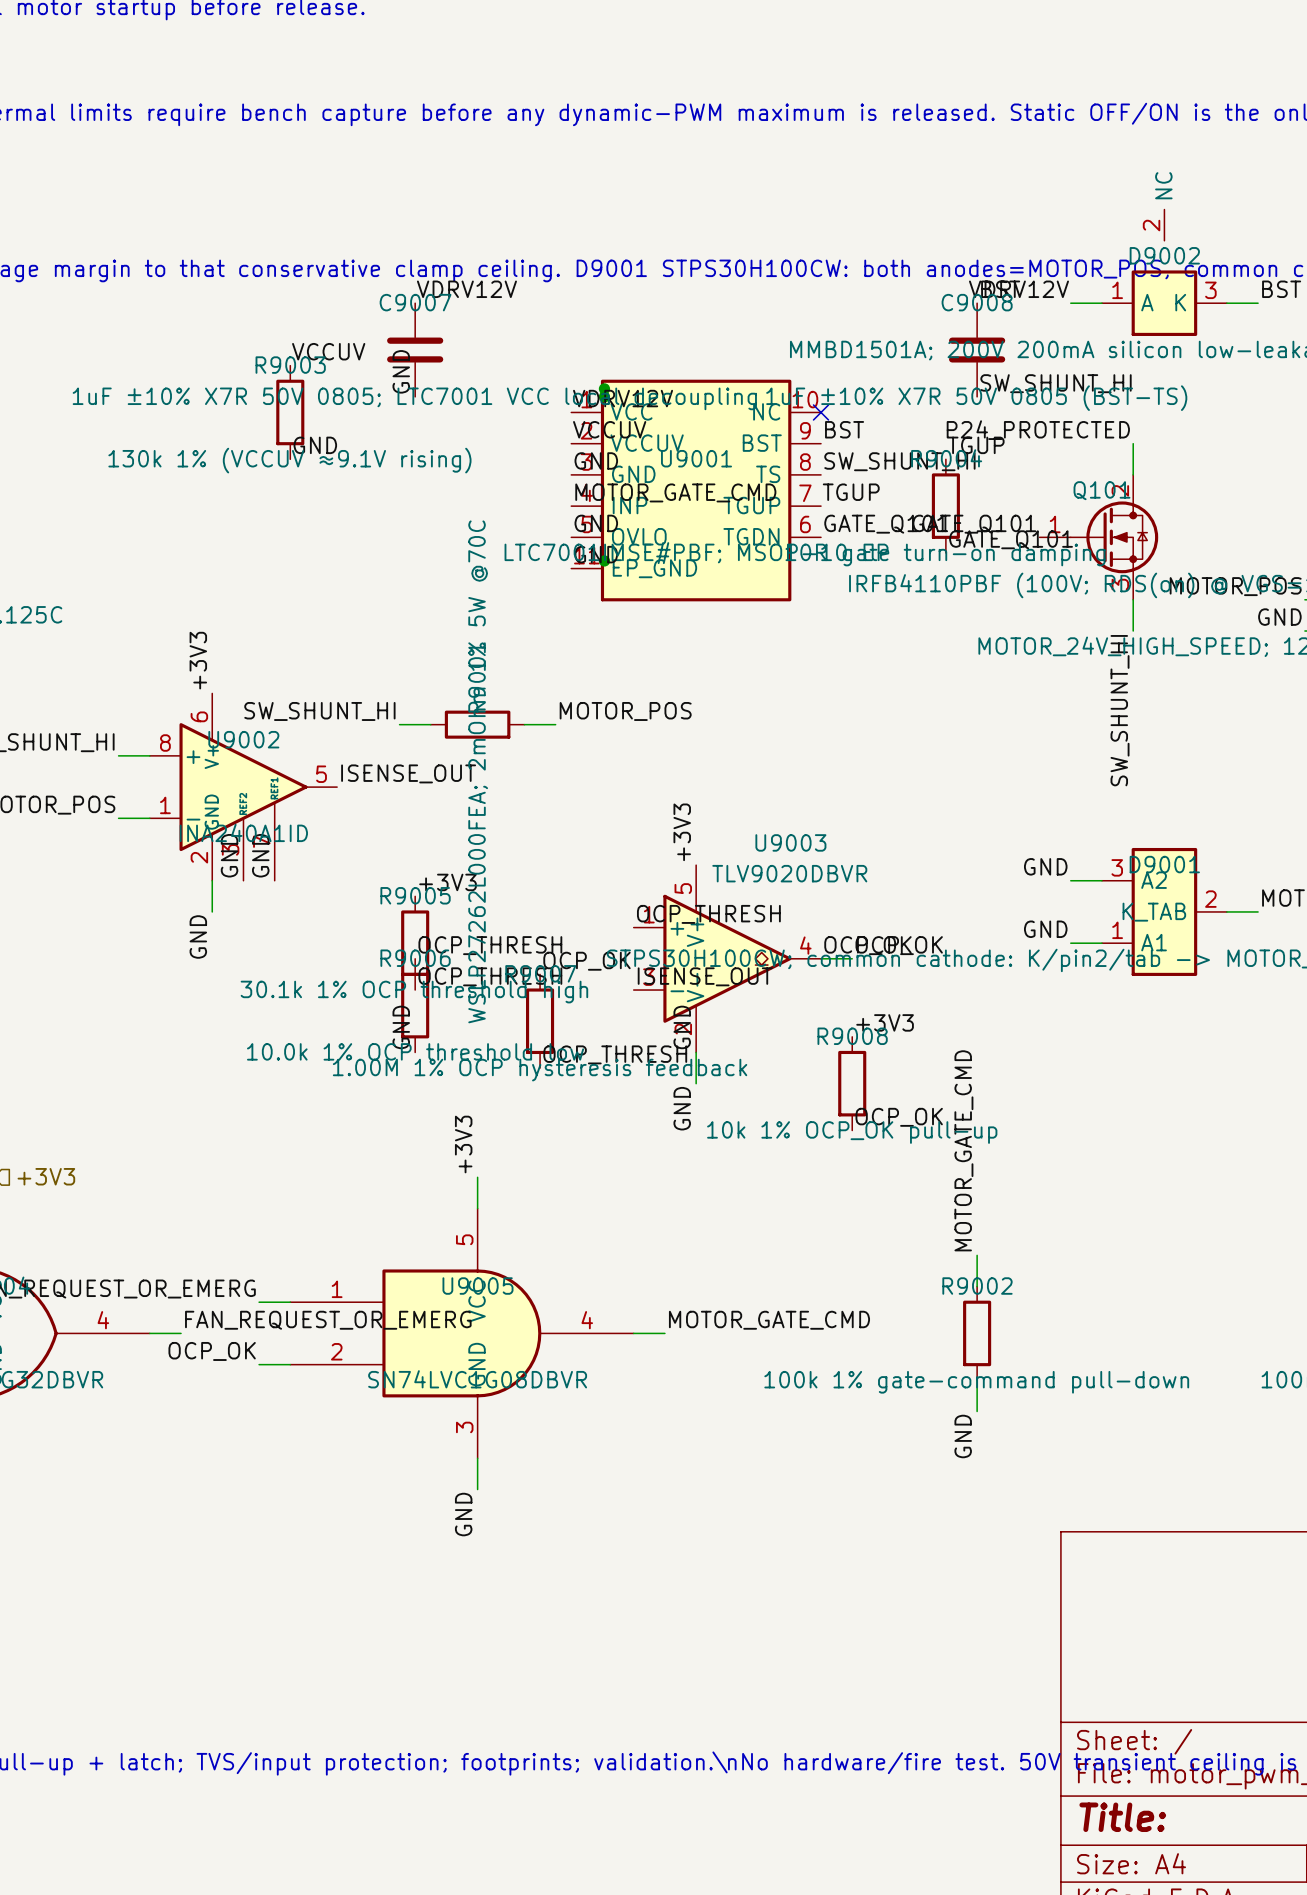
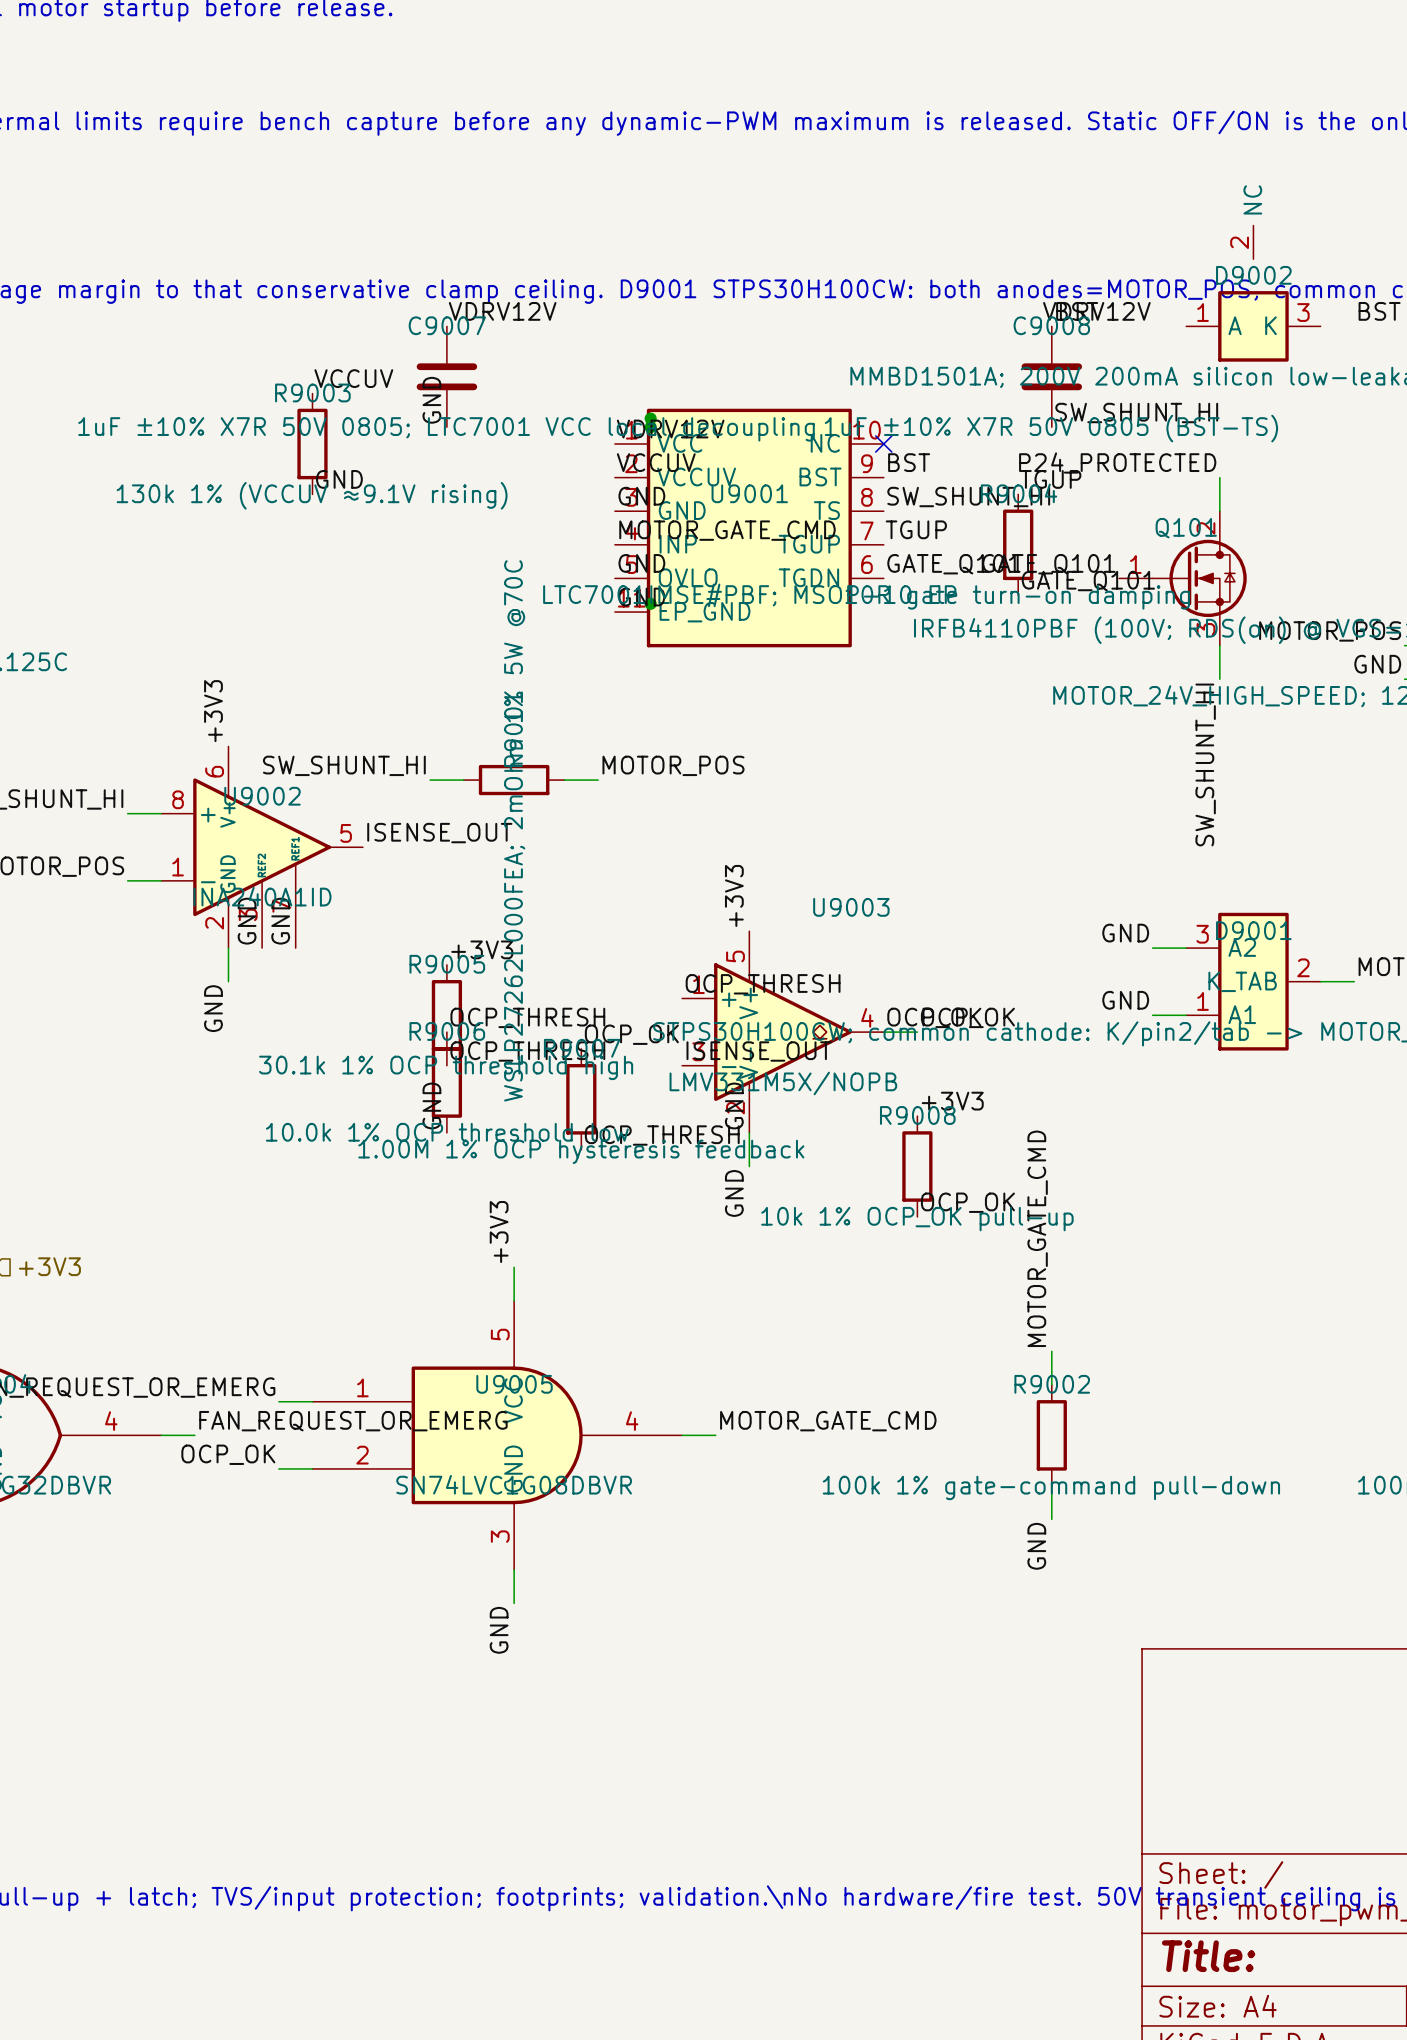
wire: (1070, 303) (1101, 303) -> none
wire: (1226, 303) (1258, 303) -> none
U9003 value: TLV9020DBVR (789, 873) -> LMV331M5X/NOPB (783, 1083)

